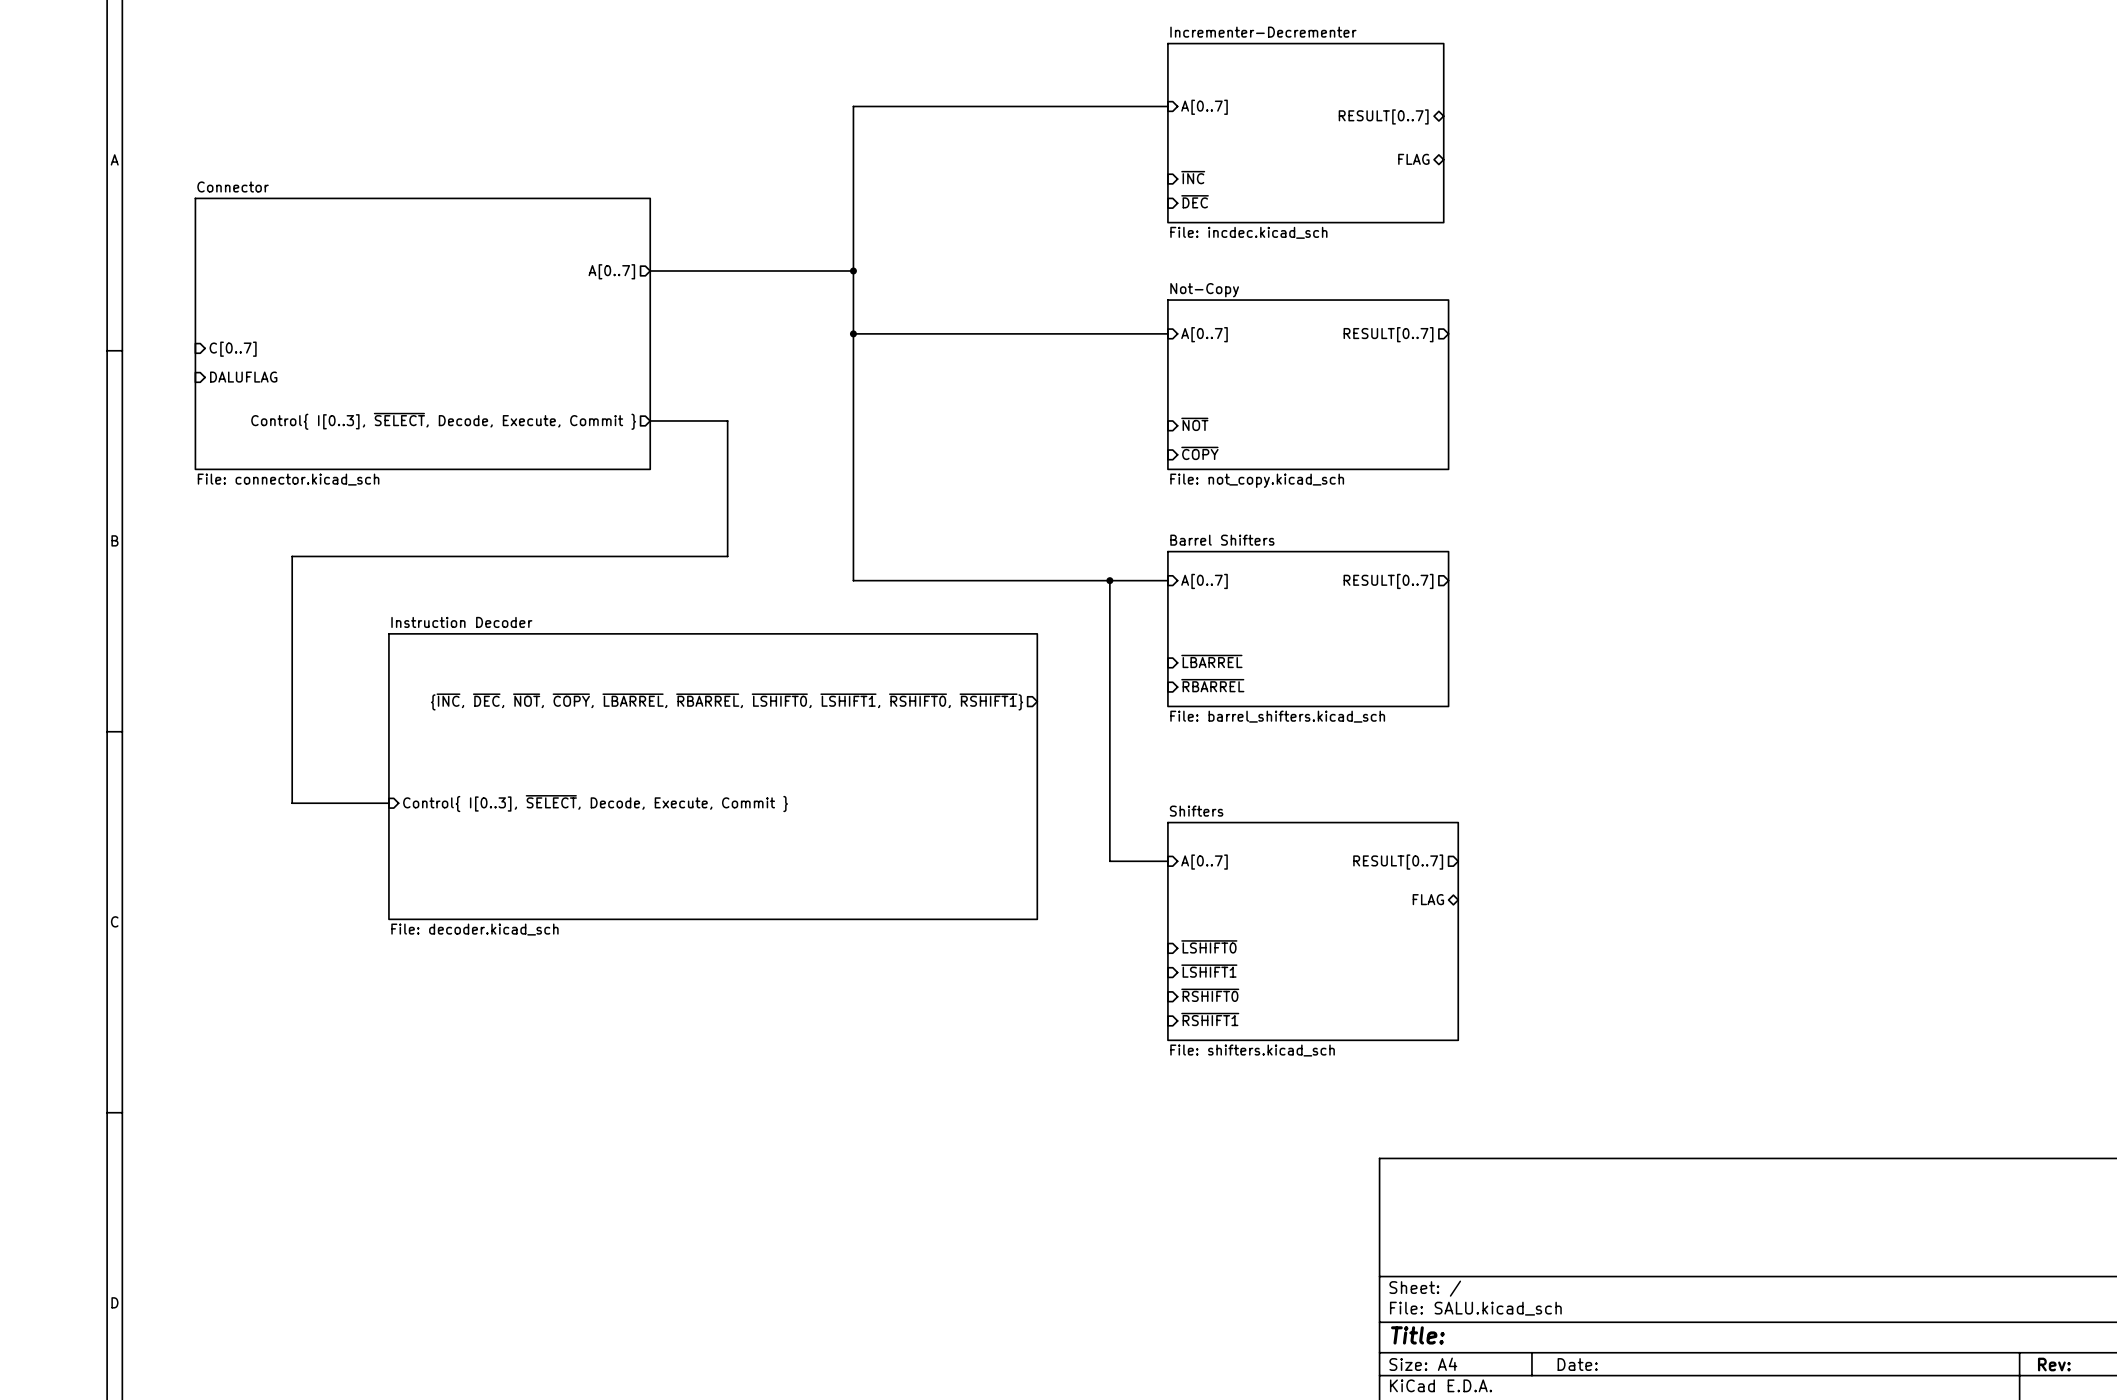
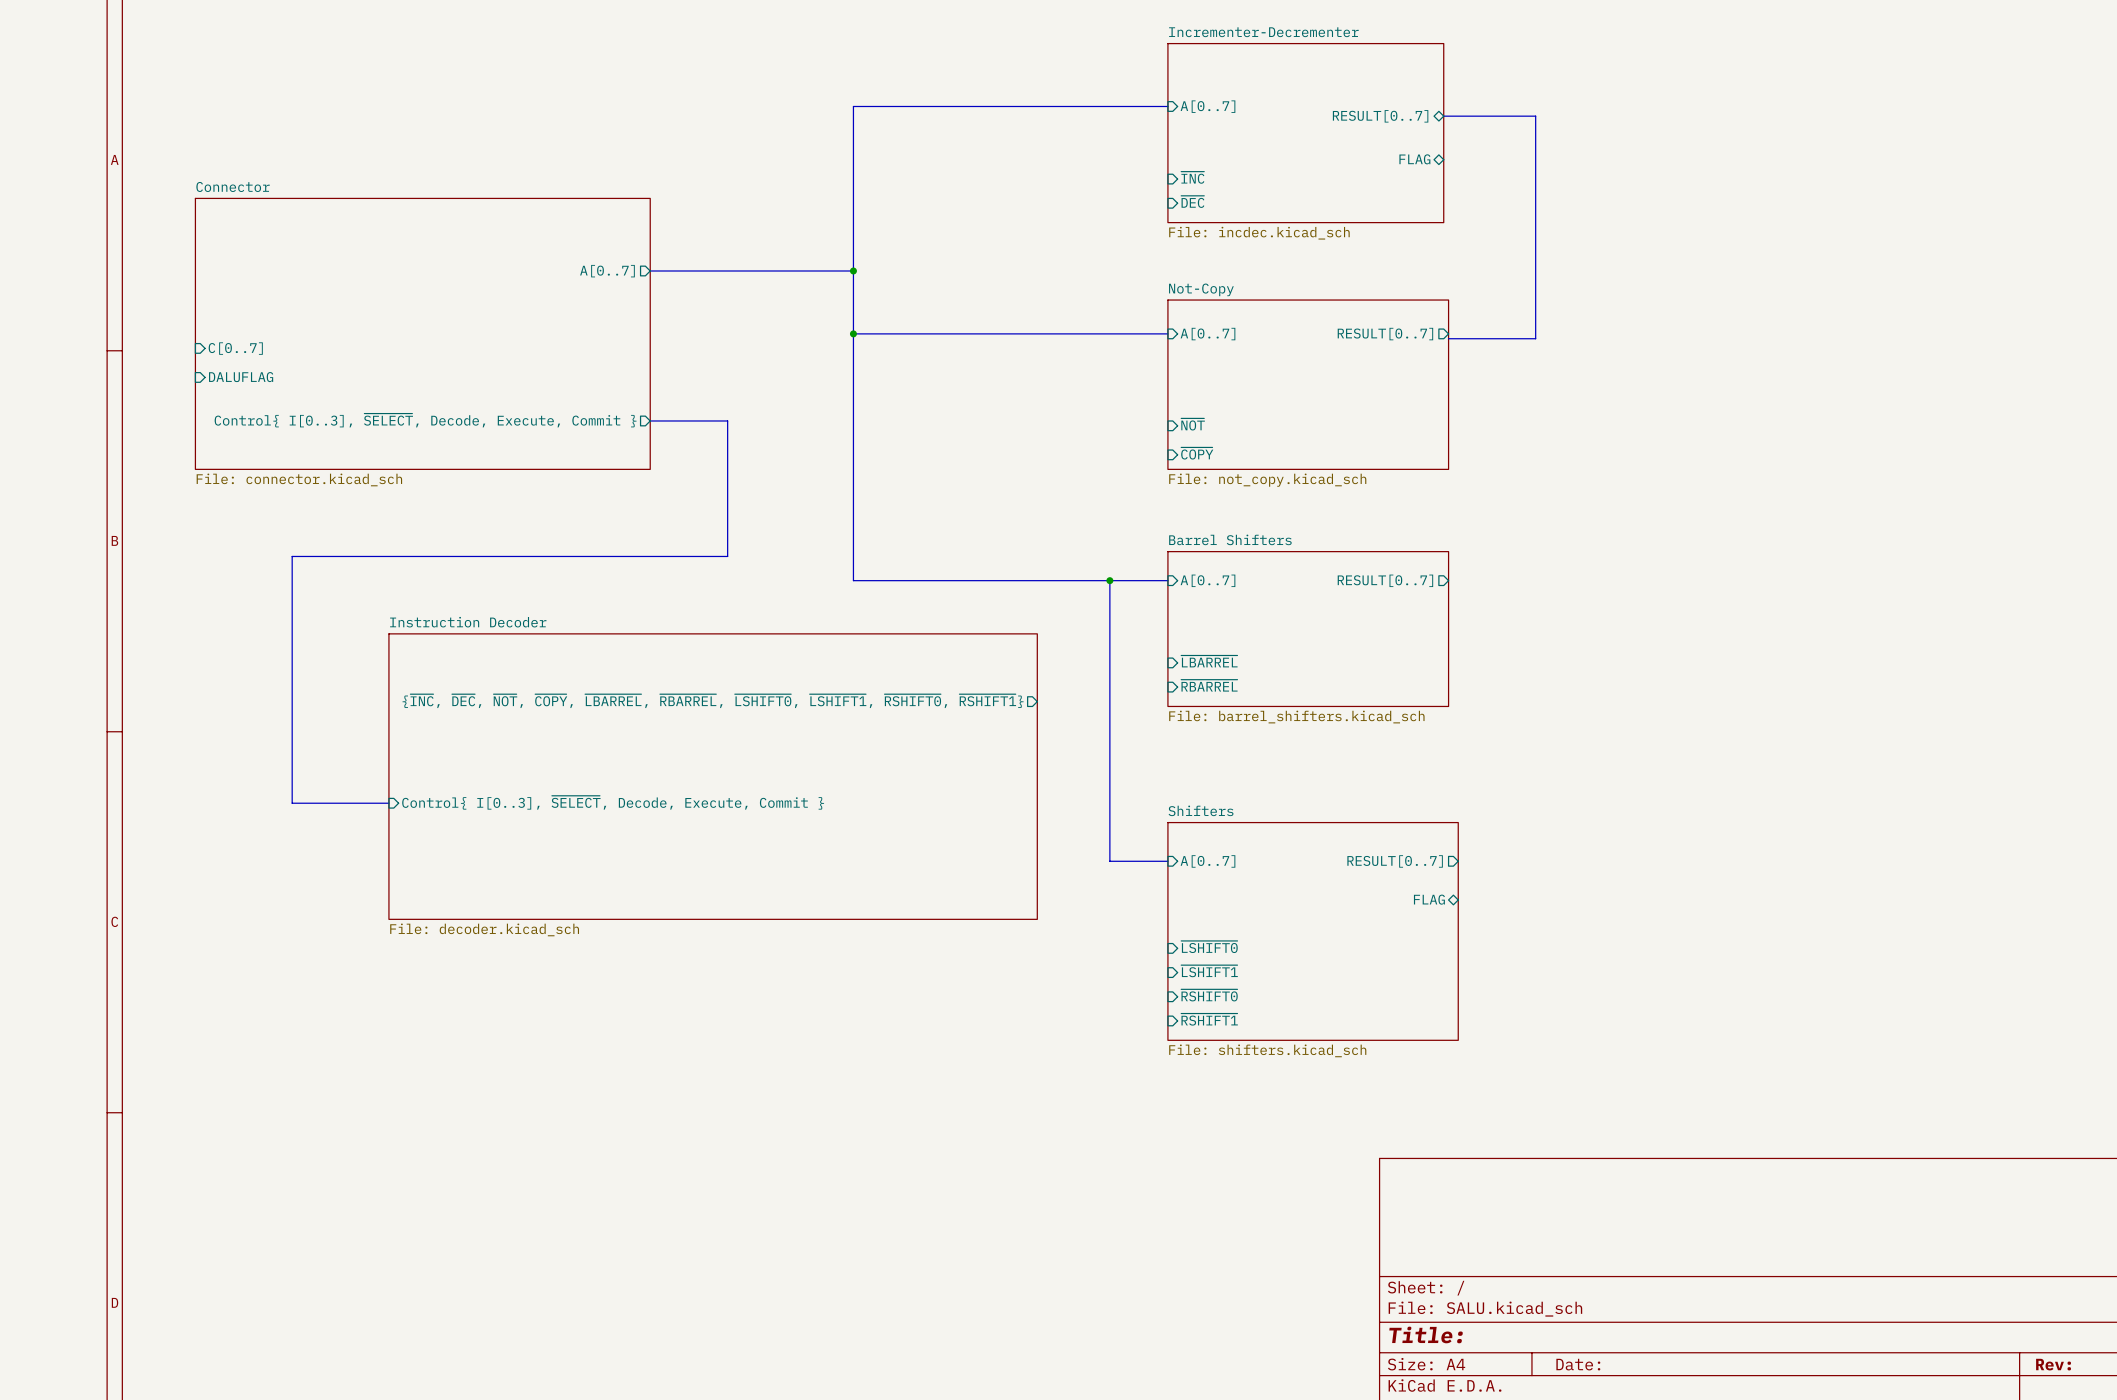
bus: none -> (1443, 116) (1535, 116) (1535, 338) (1448, 338)

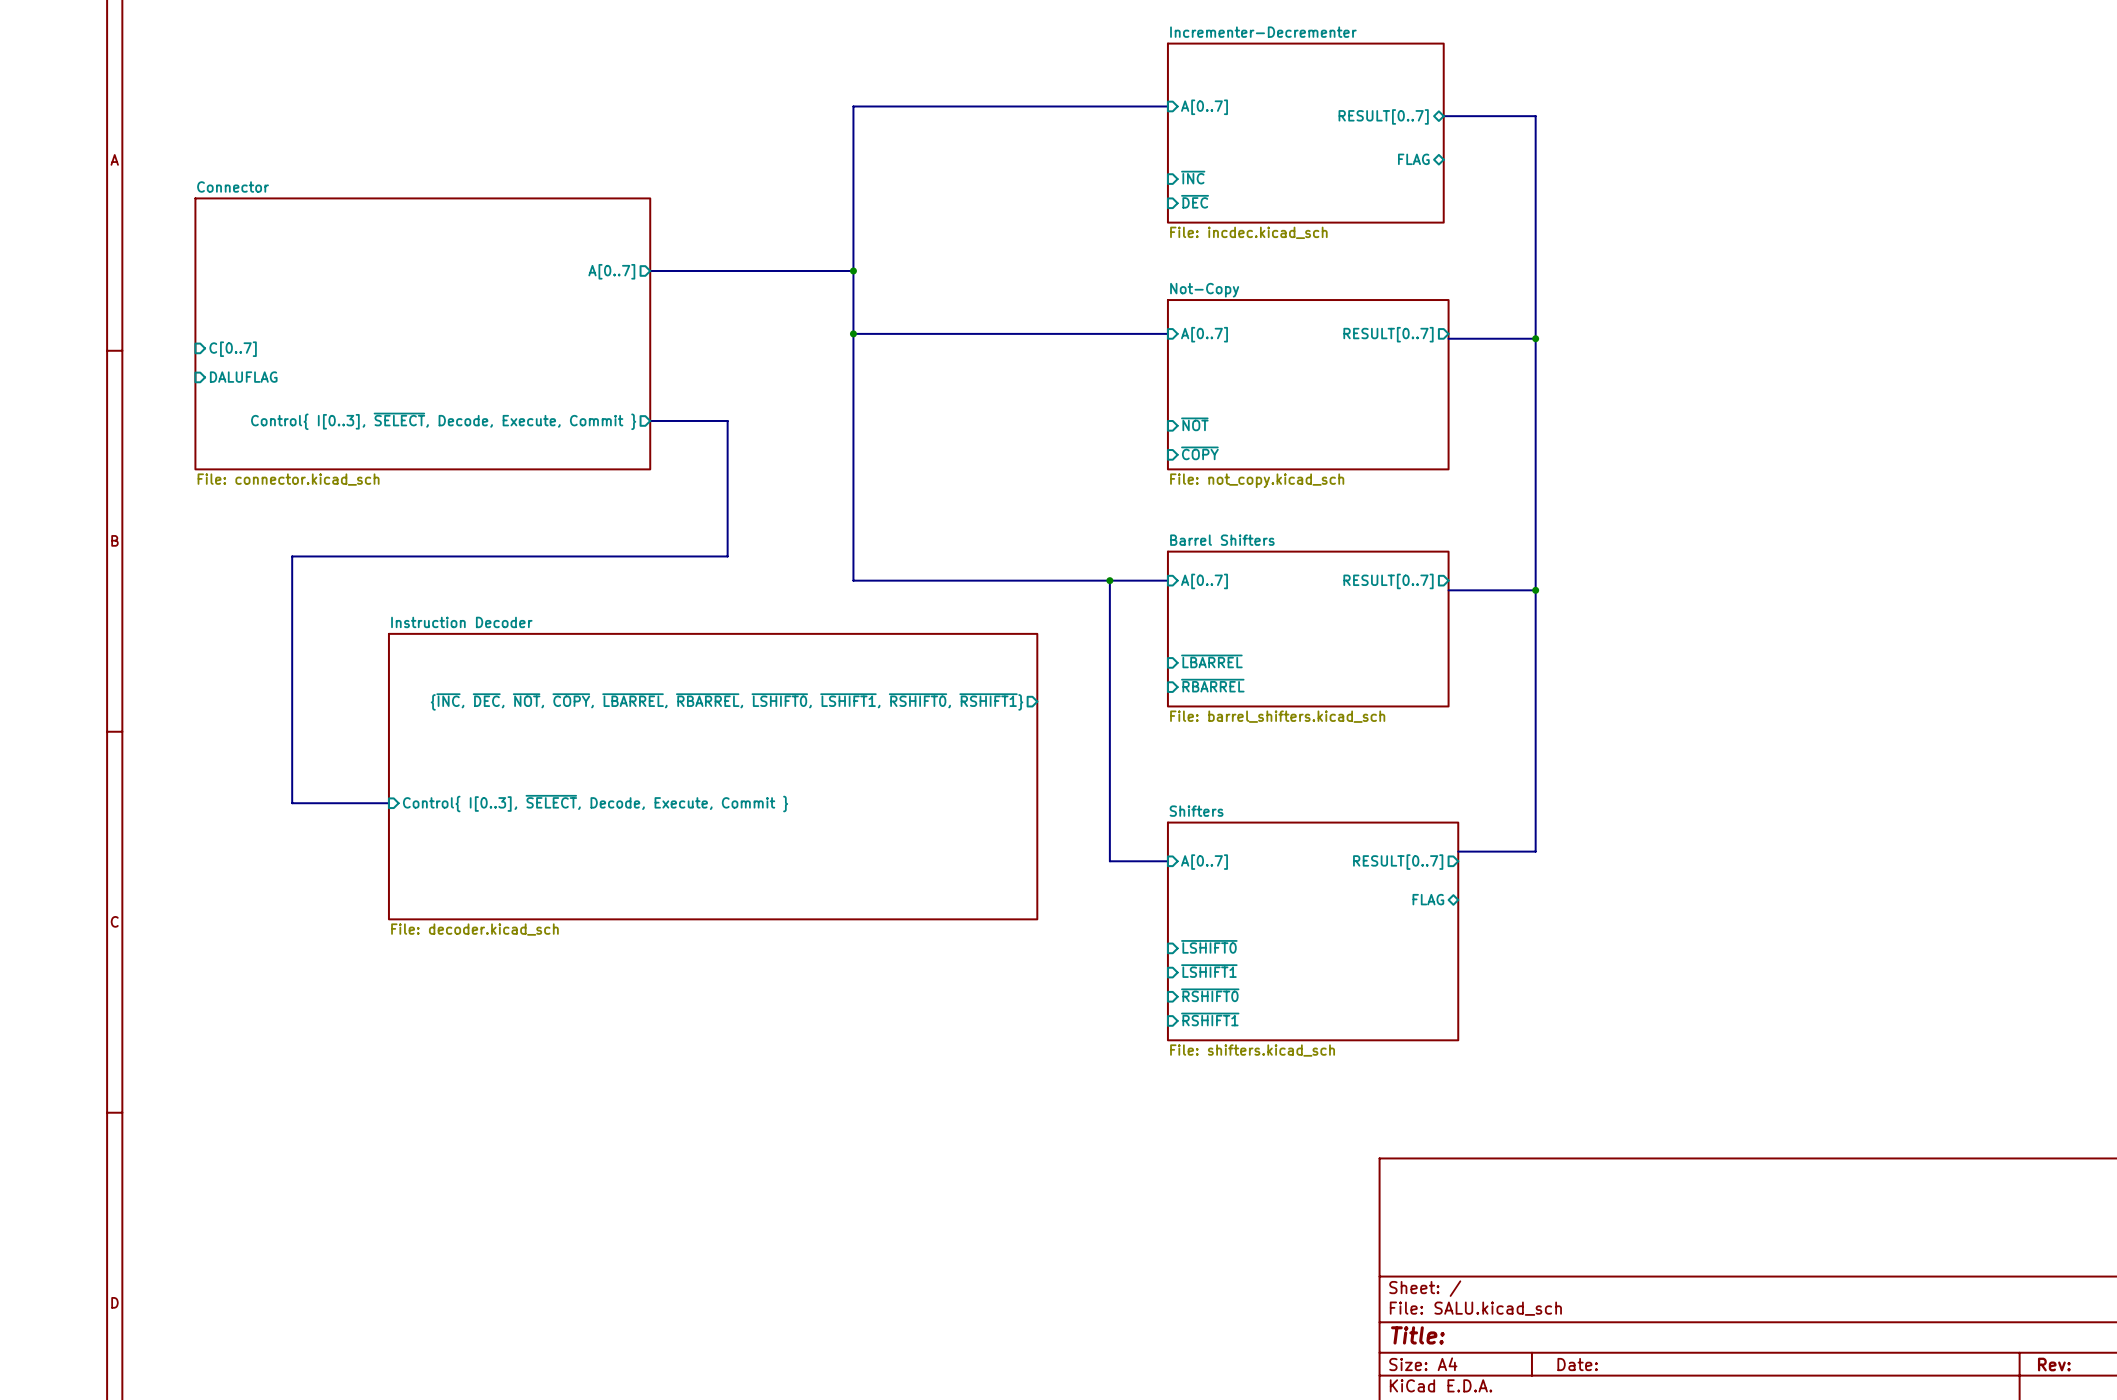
bus: none -> (1535, 338) (1535, 851) (1458, 851)
junction: none -> (1535, 338)
bus: none -> (1448, 590) (1535, 590)
junction: none -> (1535, 590)

